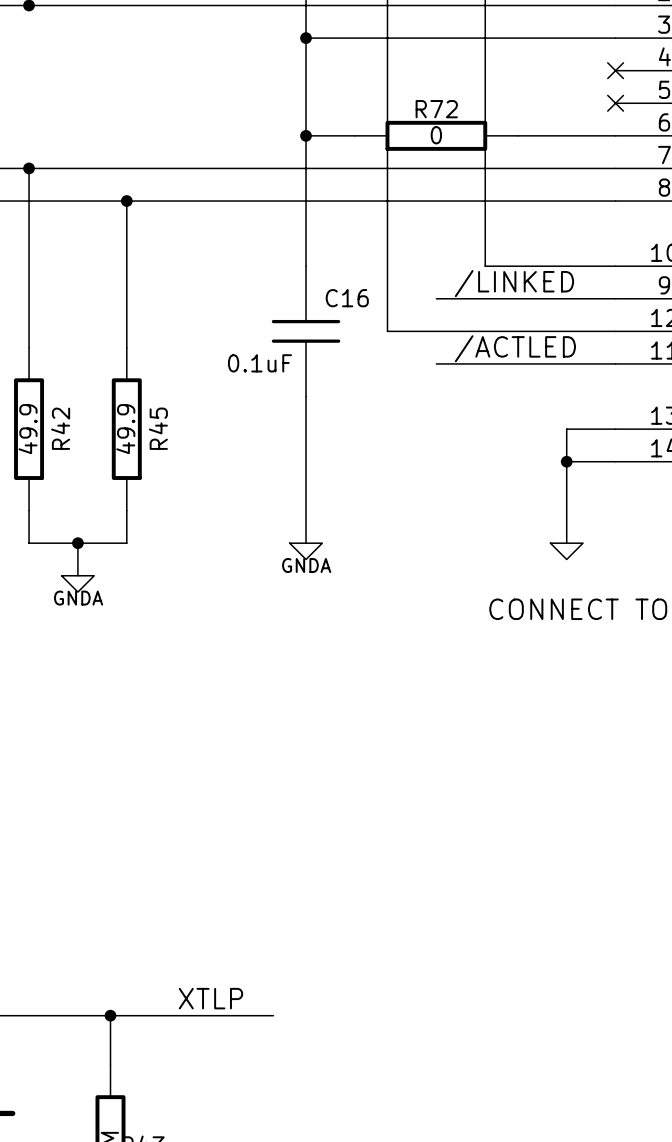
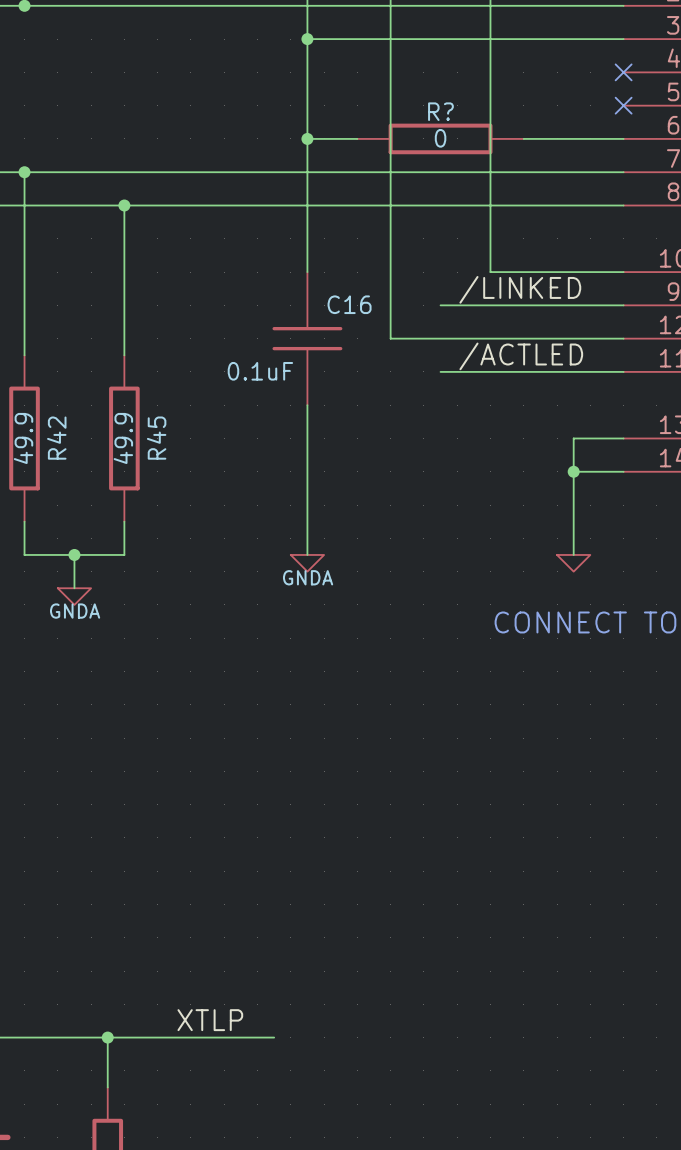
R72 name: R72 (436, 109) -> R? (440, 111)

